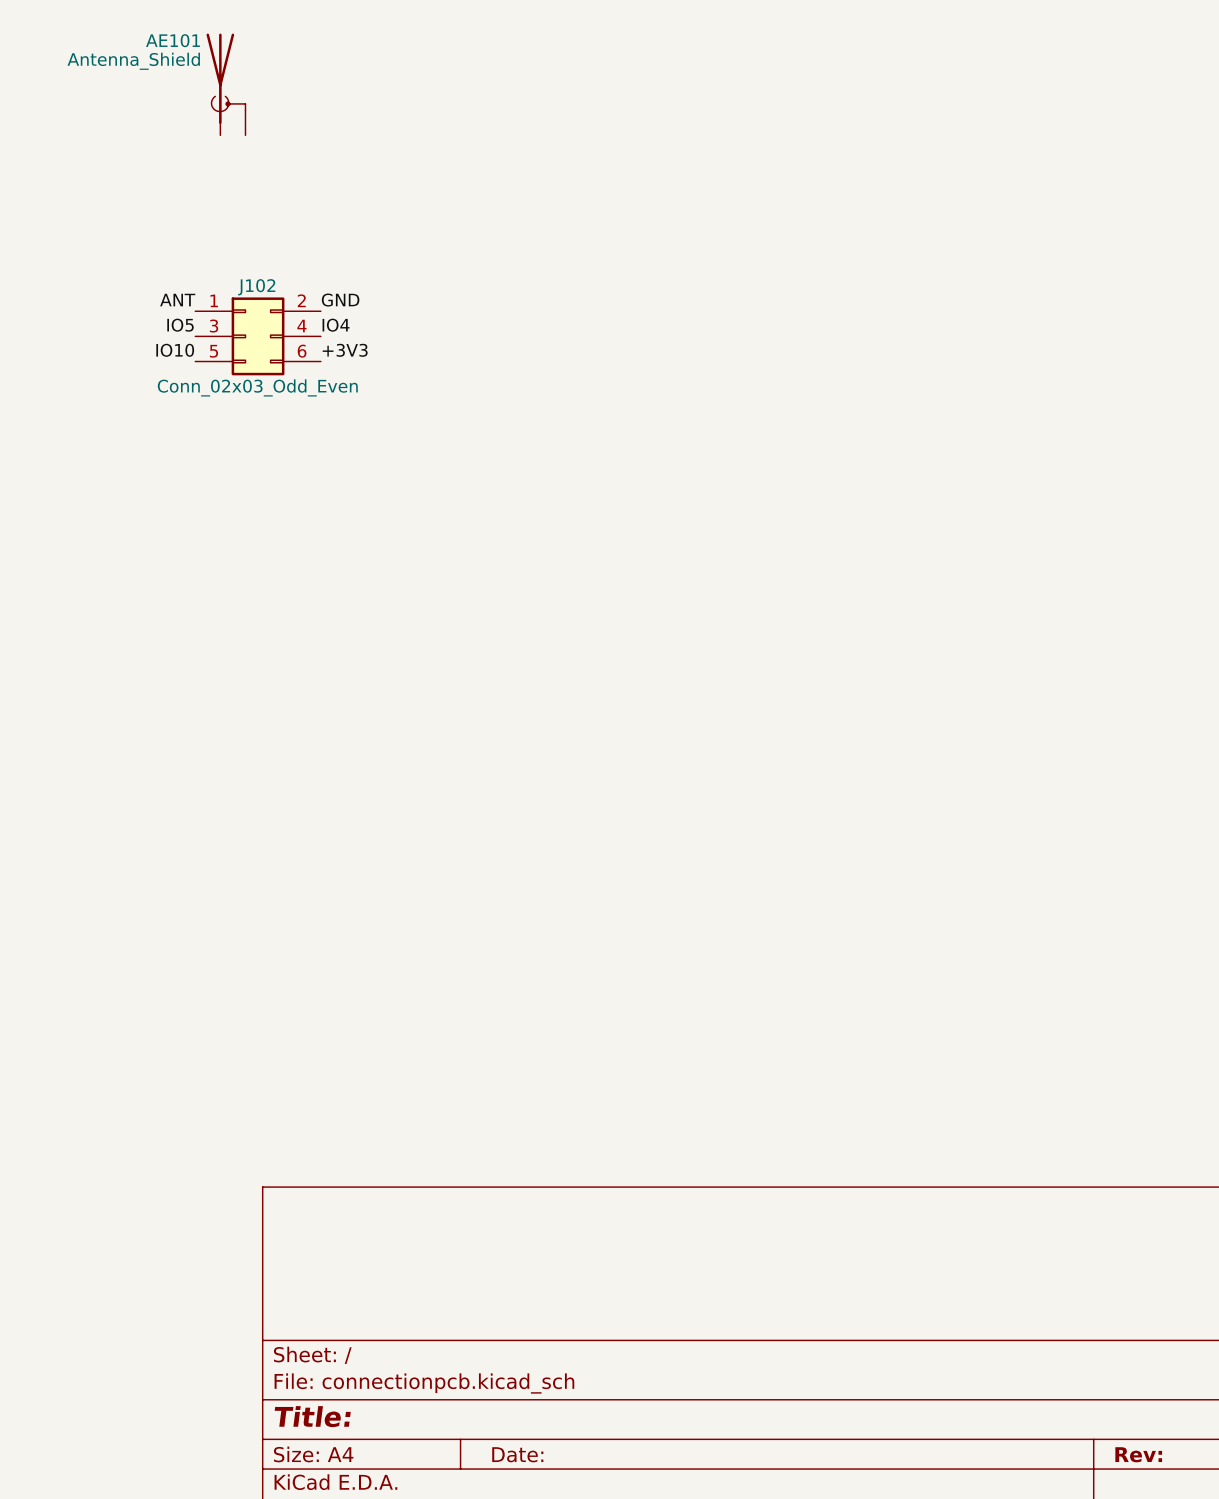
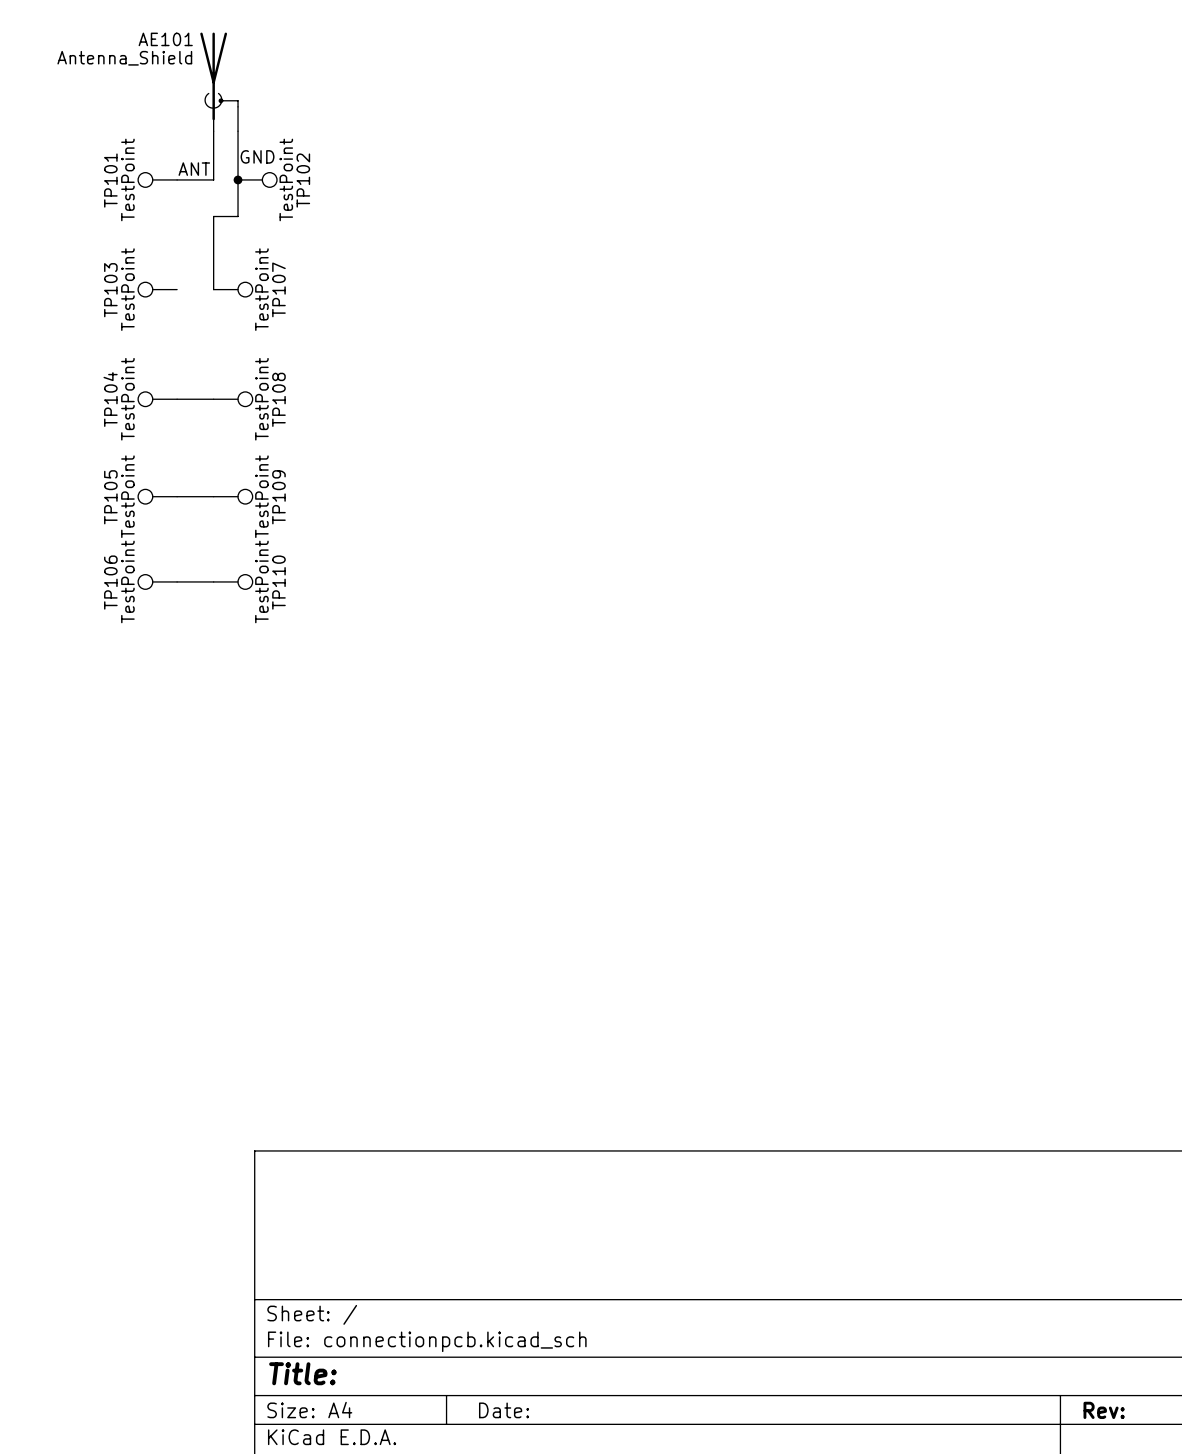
wire: none -> (213, 131) (213, 179) (177, 179)
wire: none -> (238, 131) (238, 216) (213, 216) (213, 289)
TP101: none -> TestPoint (157, 179)
junction: none -> (238, 179)
TP102: none -> TestPoint (257, 179)
TP103: none -> TestPoint (157, 289)
TP107: none -> TestPoint (233, 289)
label position: ANT (177, 300) -> ANT (194, 169)
label position: GND (340, 300) -> GND (257, 156)
label: IO5 (180, 325) -> none
label: IO4 (336, 325) -> none
J102: Conn_02x03_Odd_Even (258, 336) -> none
label: IO10 (175, 350) -> none
label: +3V3 (345, 350) -> none
TP104: none -> TestPoint (157, 399)
wire: none -> (177, 399) (213, 399)
TP108: none -> TestPoint (233, 399)
TP105: none -> TestPoint (157, 496)
wire: none -> (177, 496) (213, 496)
TP109: none -> TestPoint (233, 496)
TP106: none -> TestPoint (157, 581)
wire: none -> (177, 581) (213, 581)
TP110: none -> TestPoint (233, 581)

